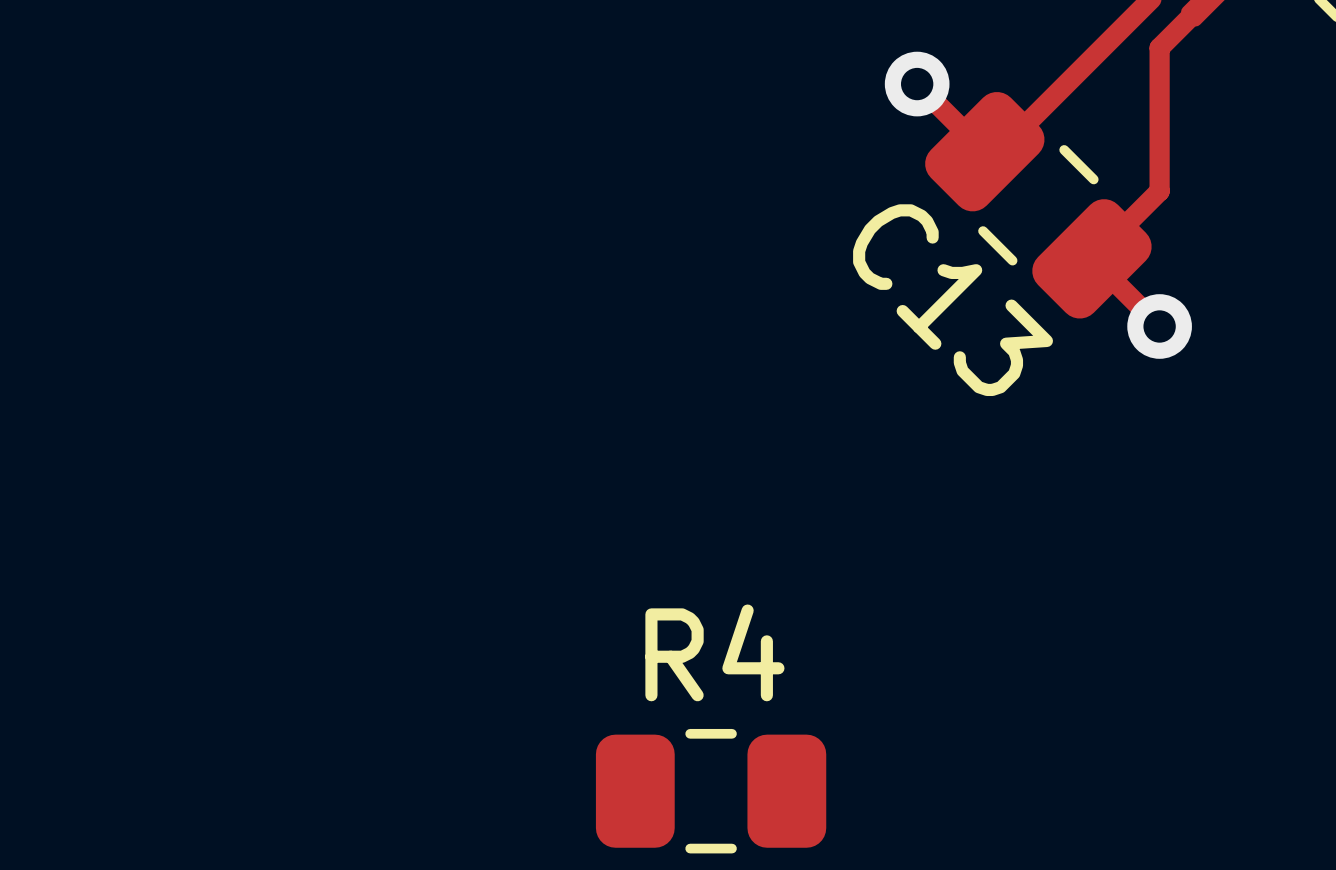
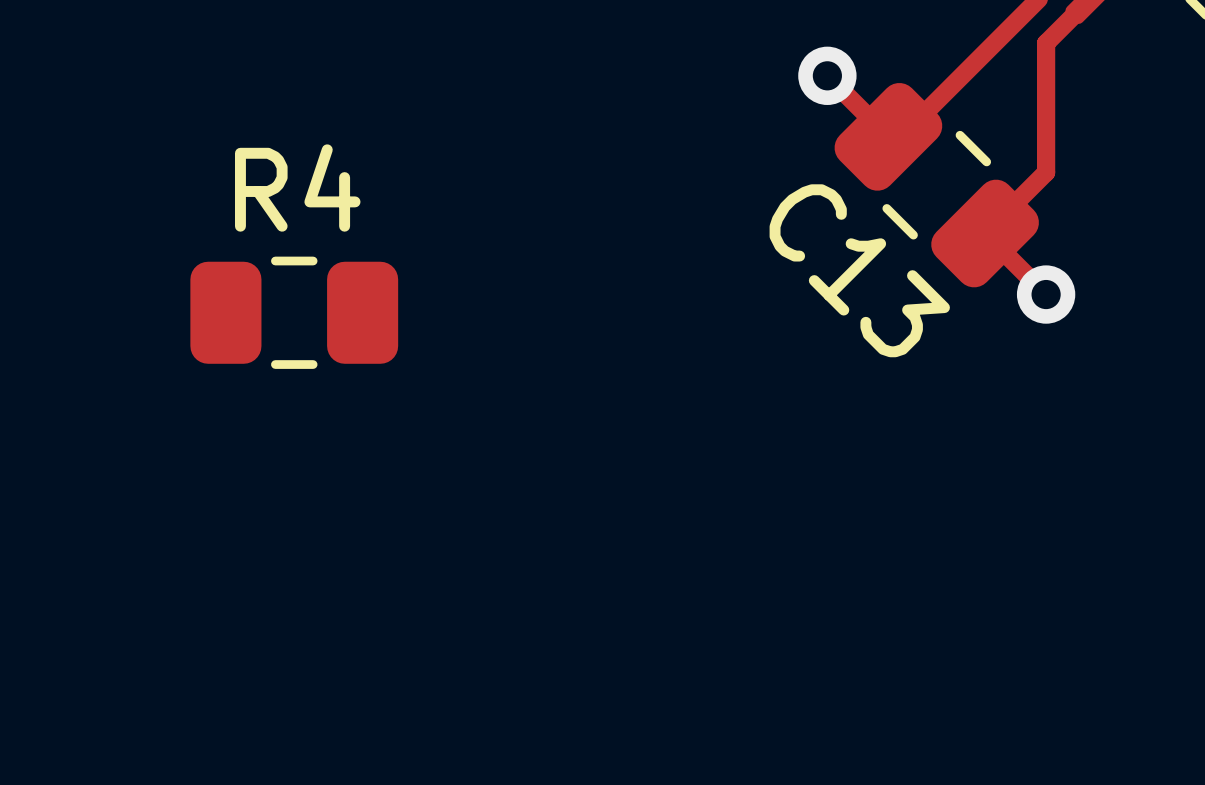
R4 position: (711, 791) -> (294, 312)

